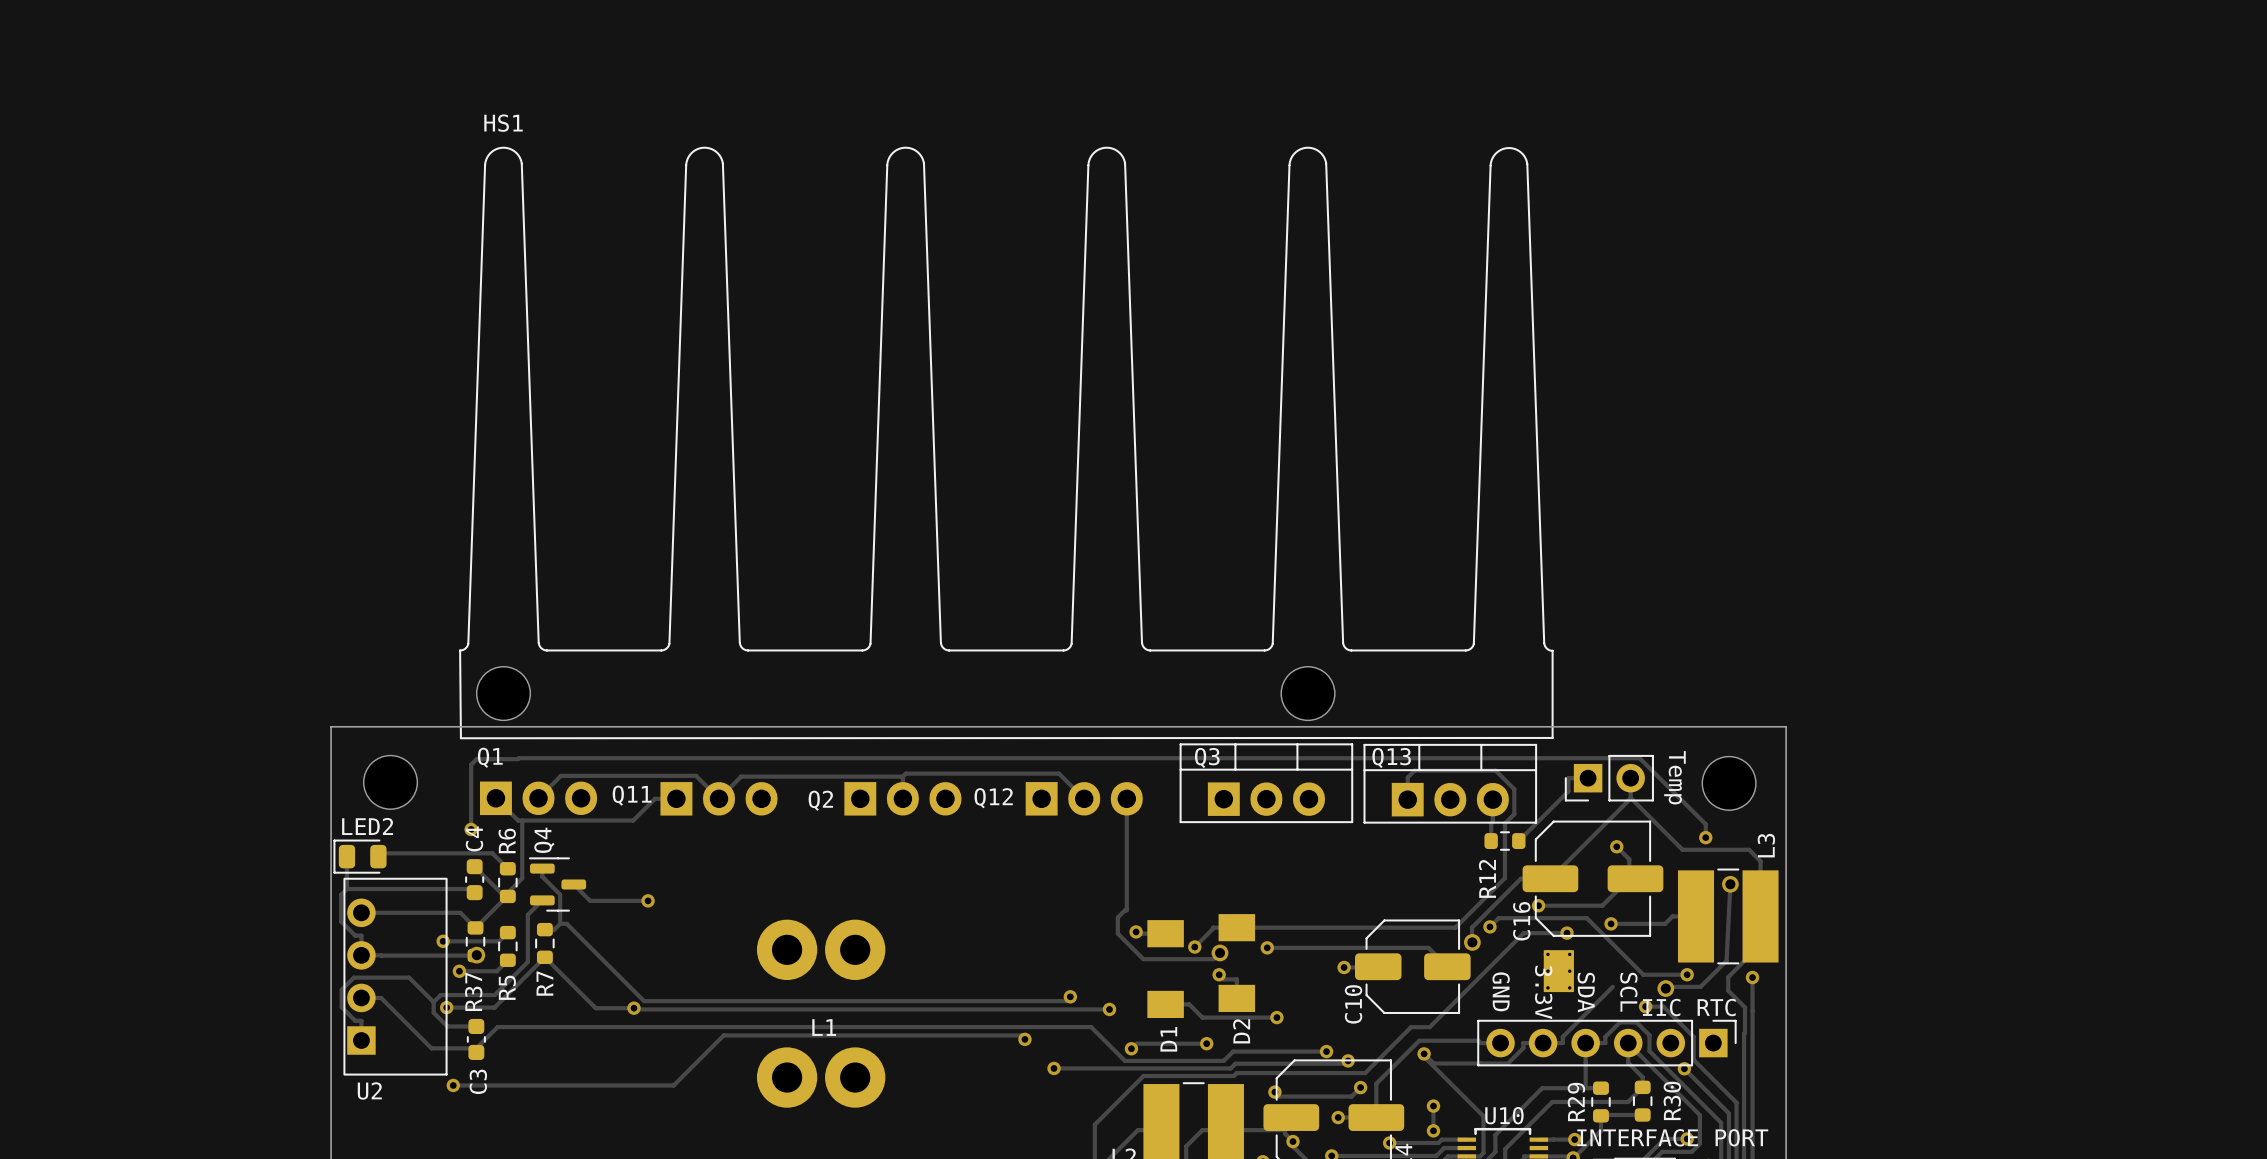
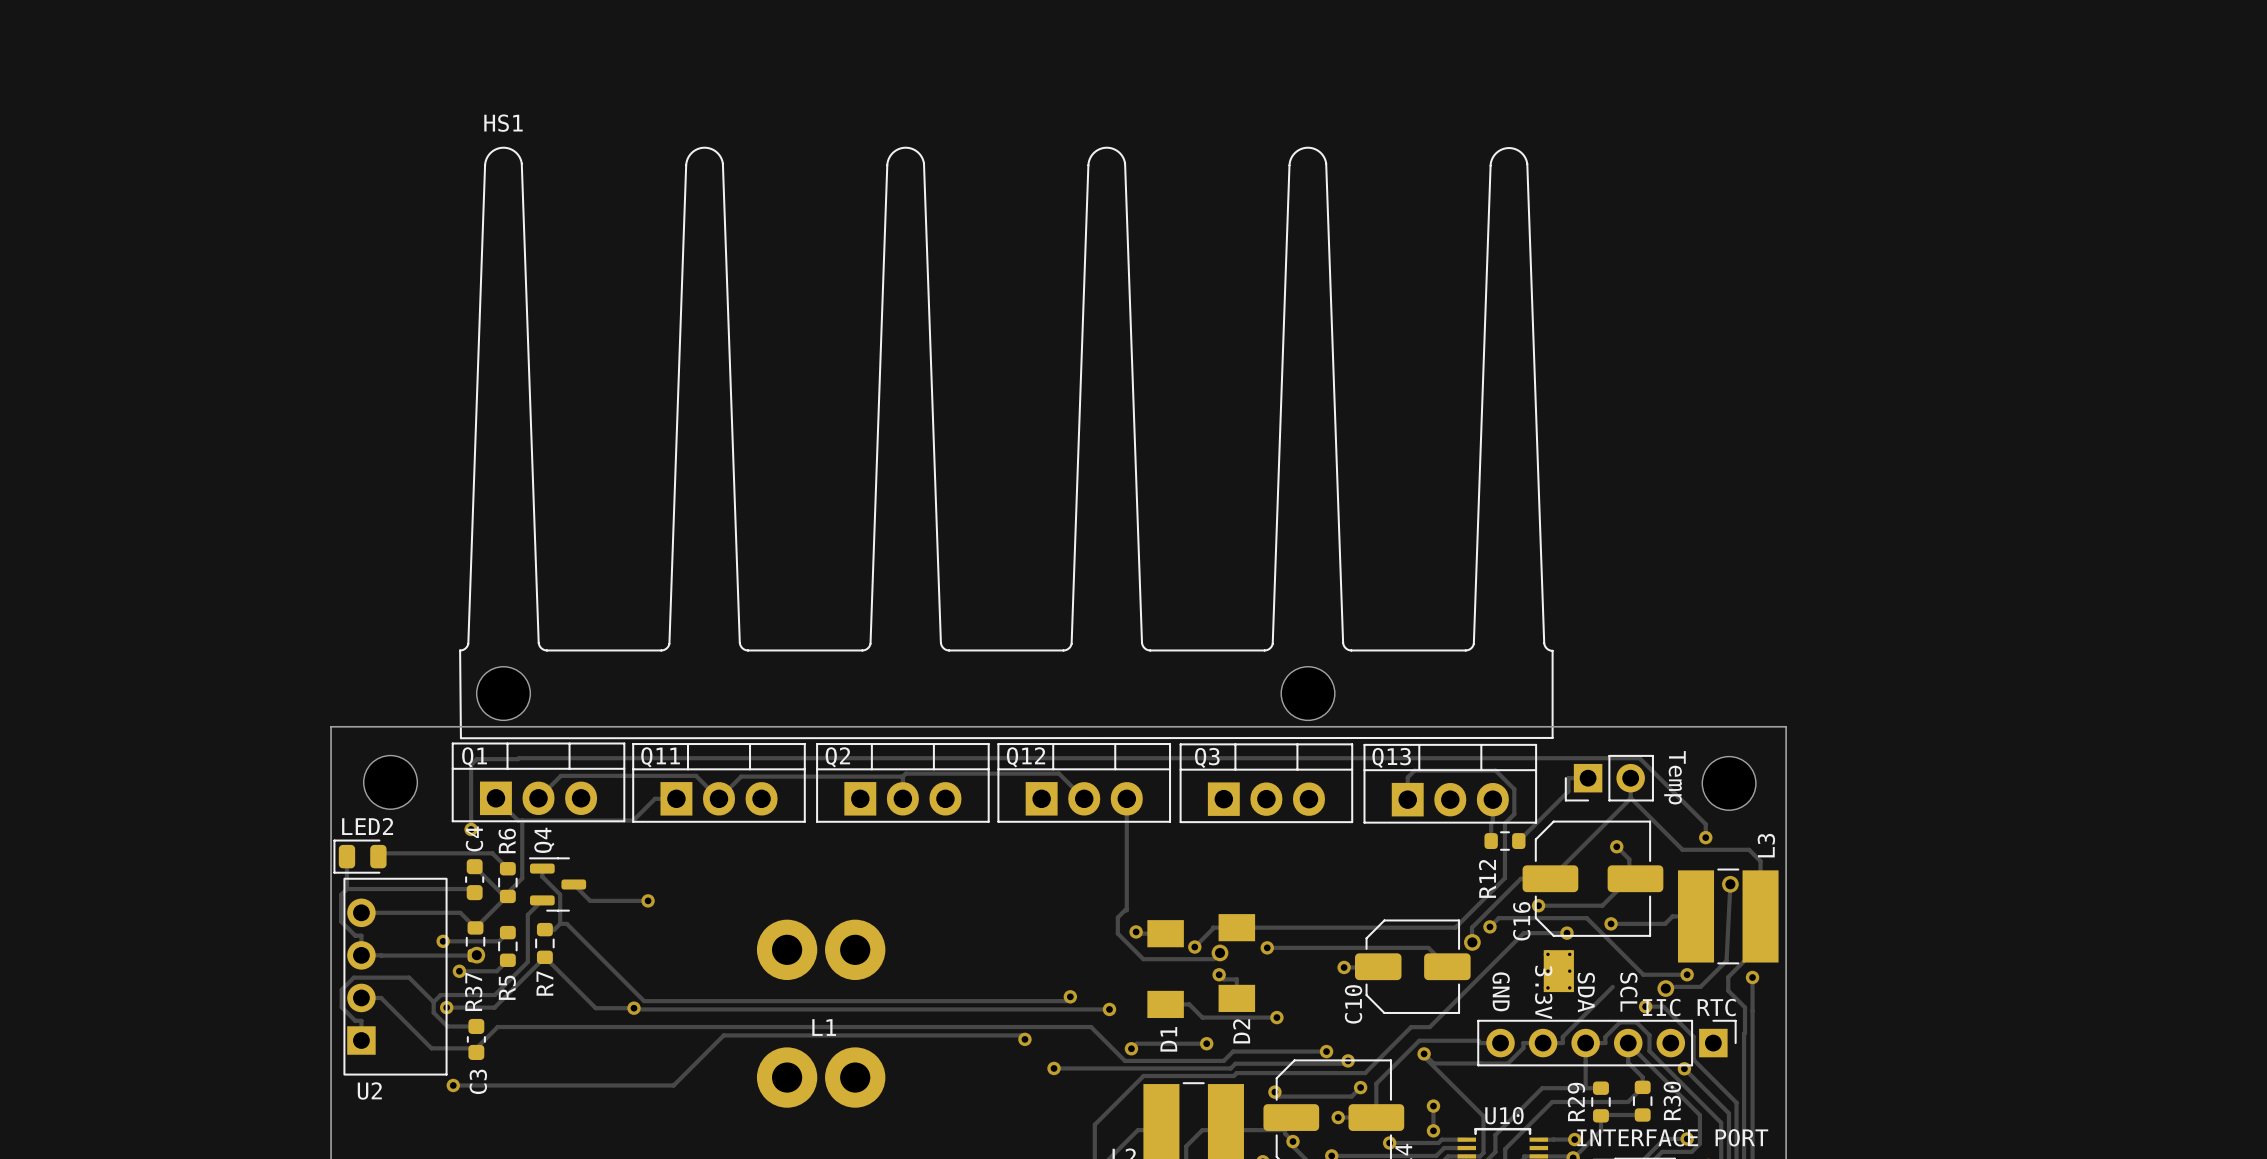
Q1 footprint: [479, 781, 598, 816] -> [451, 742, 626, 823]
Q11 footprint: [660, 782, 778, 816] -> [632, 743, 806, 823]
Q2 footprint: [844, 782, 962, 816] -> [816, 743, 990, 823]
Q12 footprint: [1025, 782, 1143, 816] -> [997, 743, 1172, 823]
Q11 name position: Q11 (632, 795) -> Q11 (660, 757)
Q12 name position: Q12 (993, 798) -> Q12 (1026, 757)

